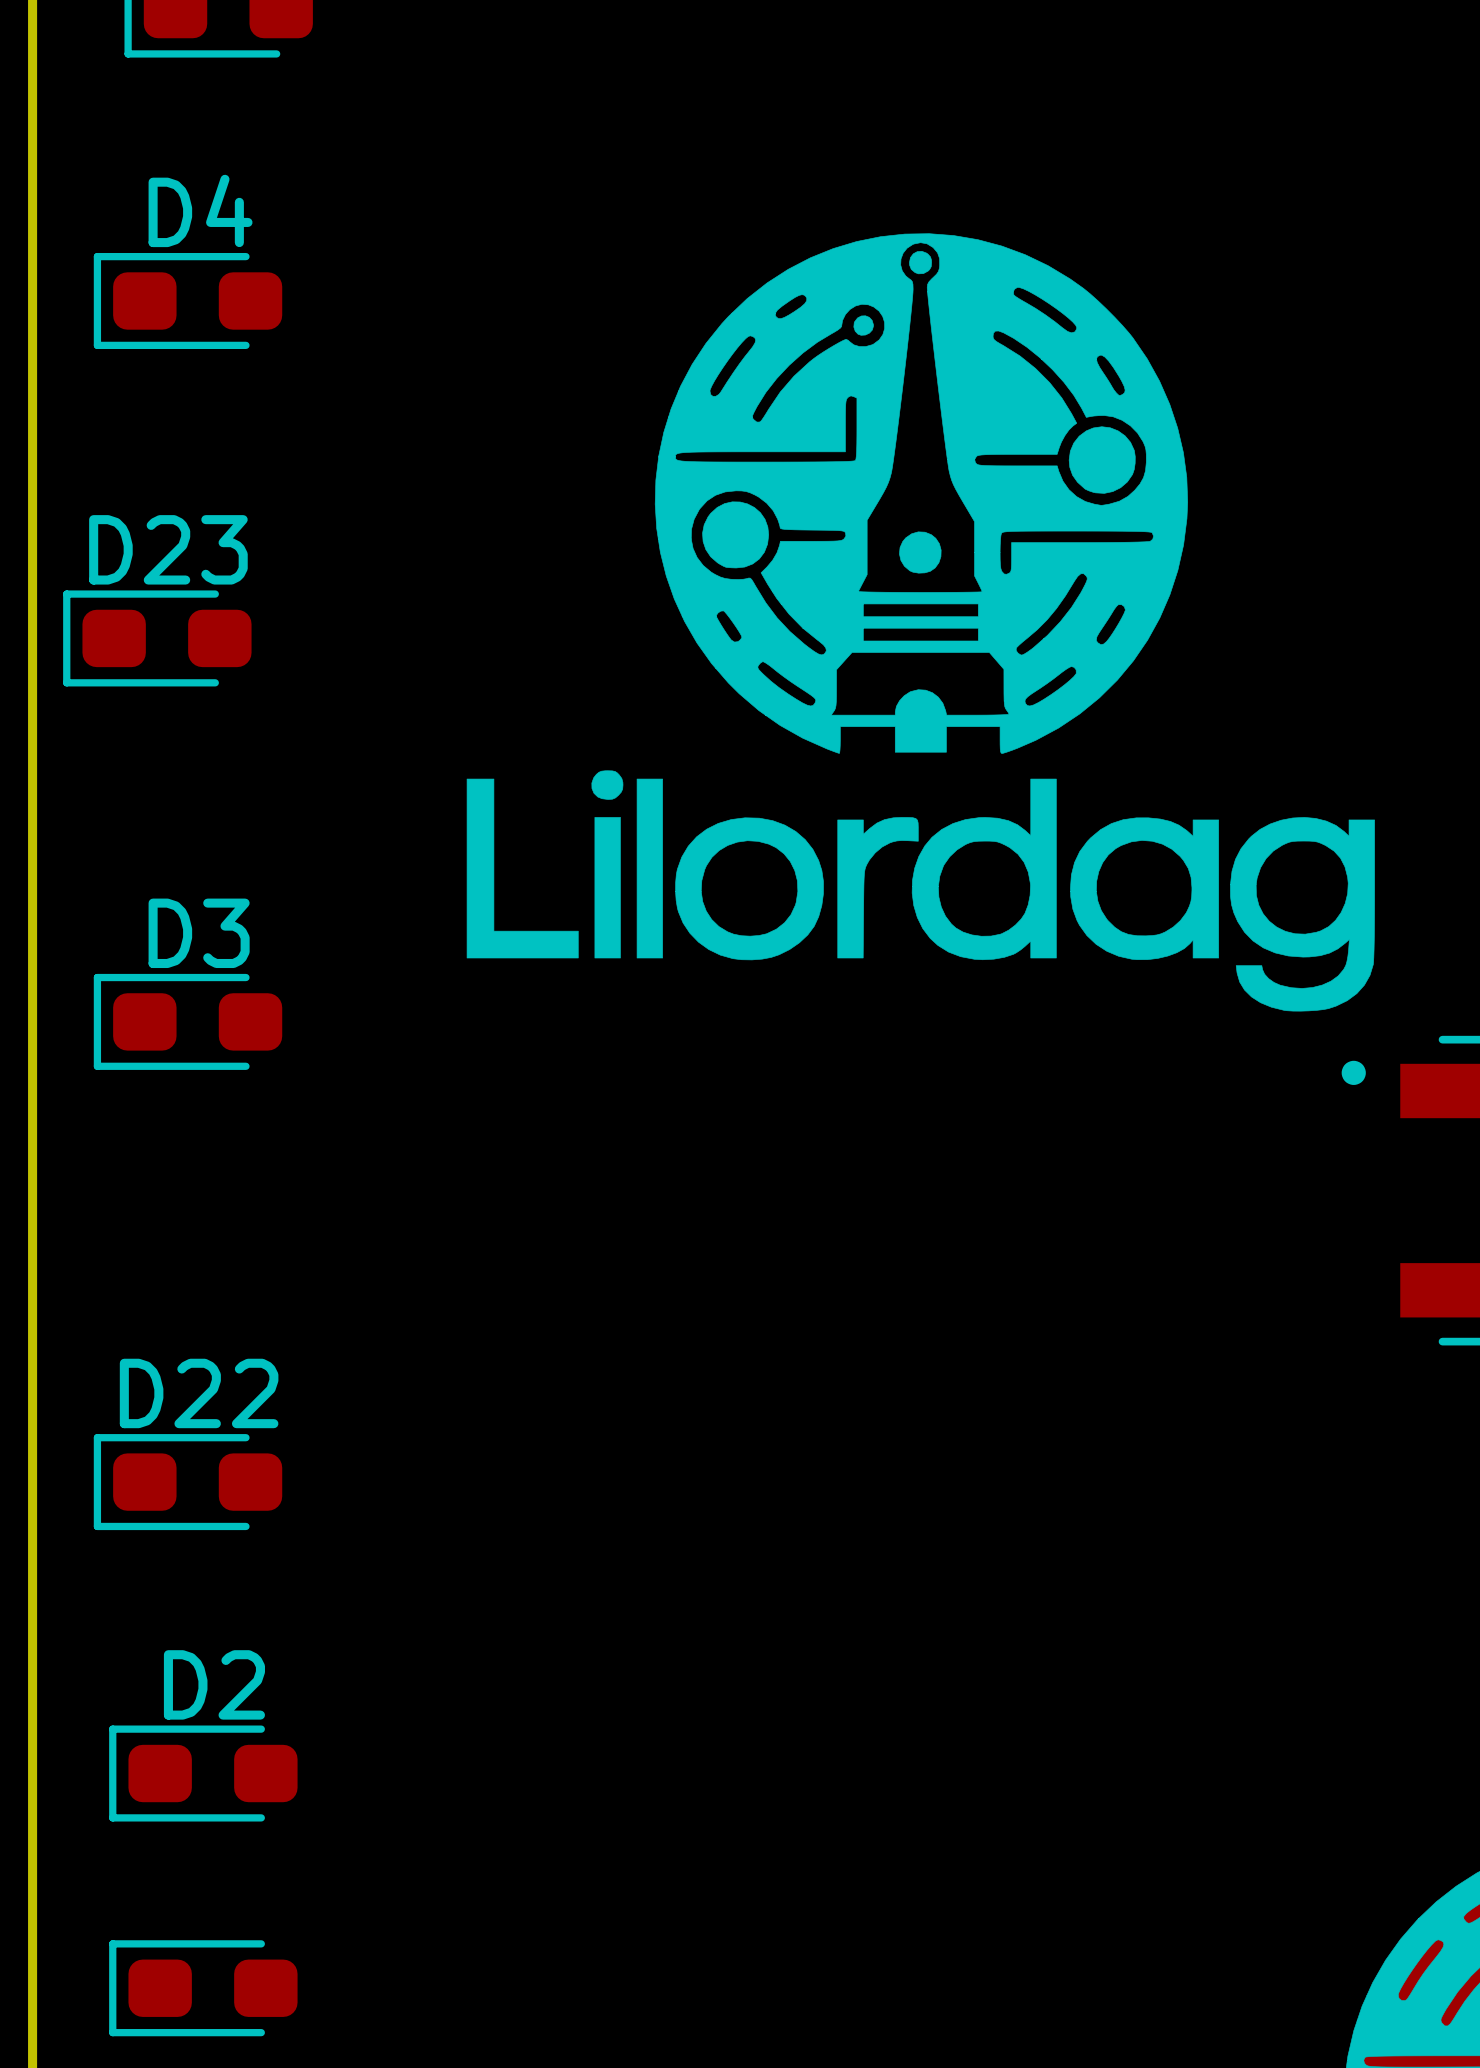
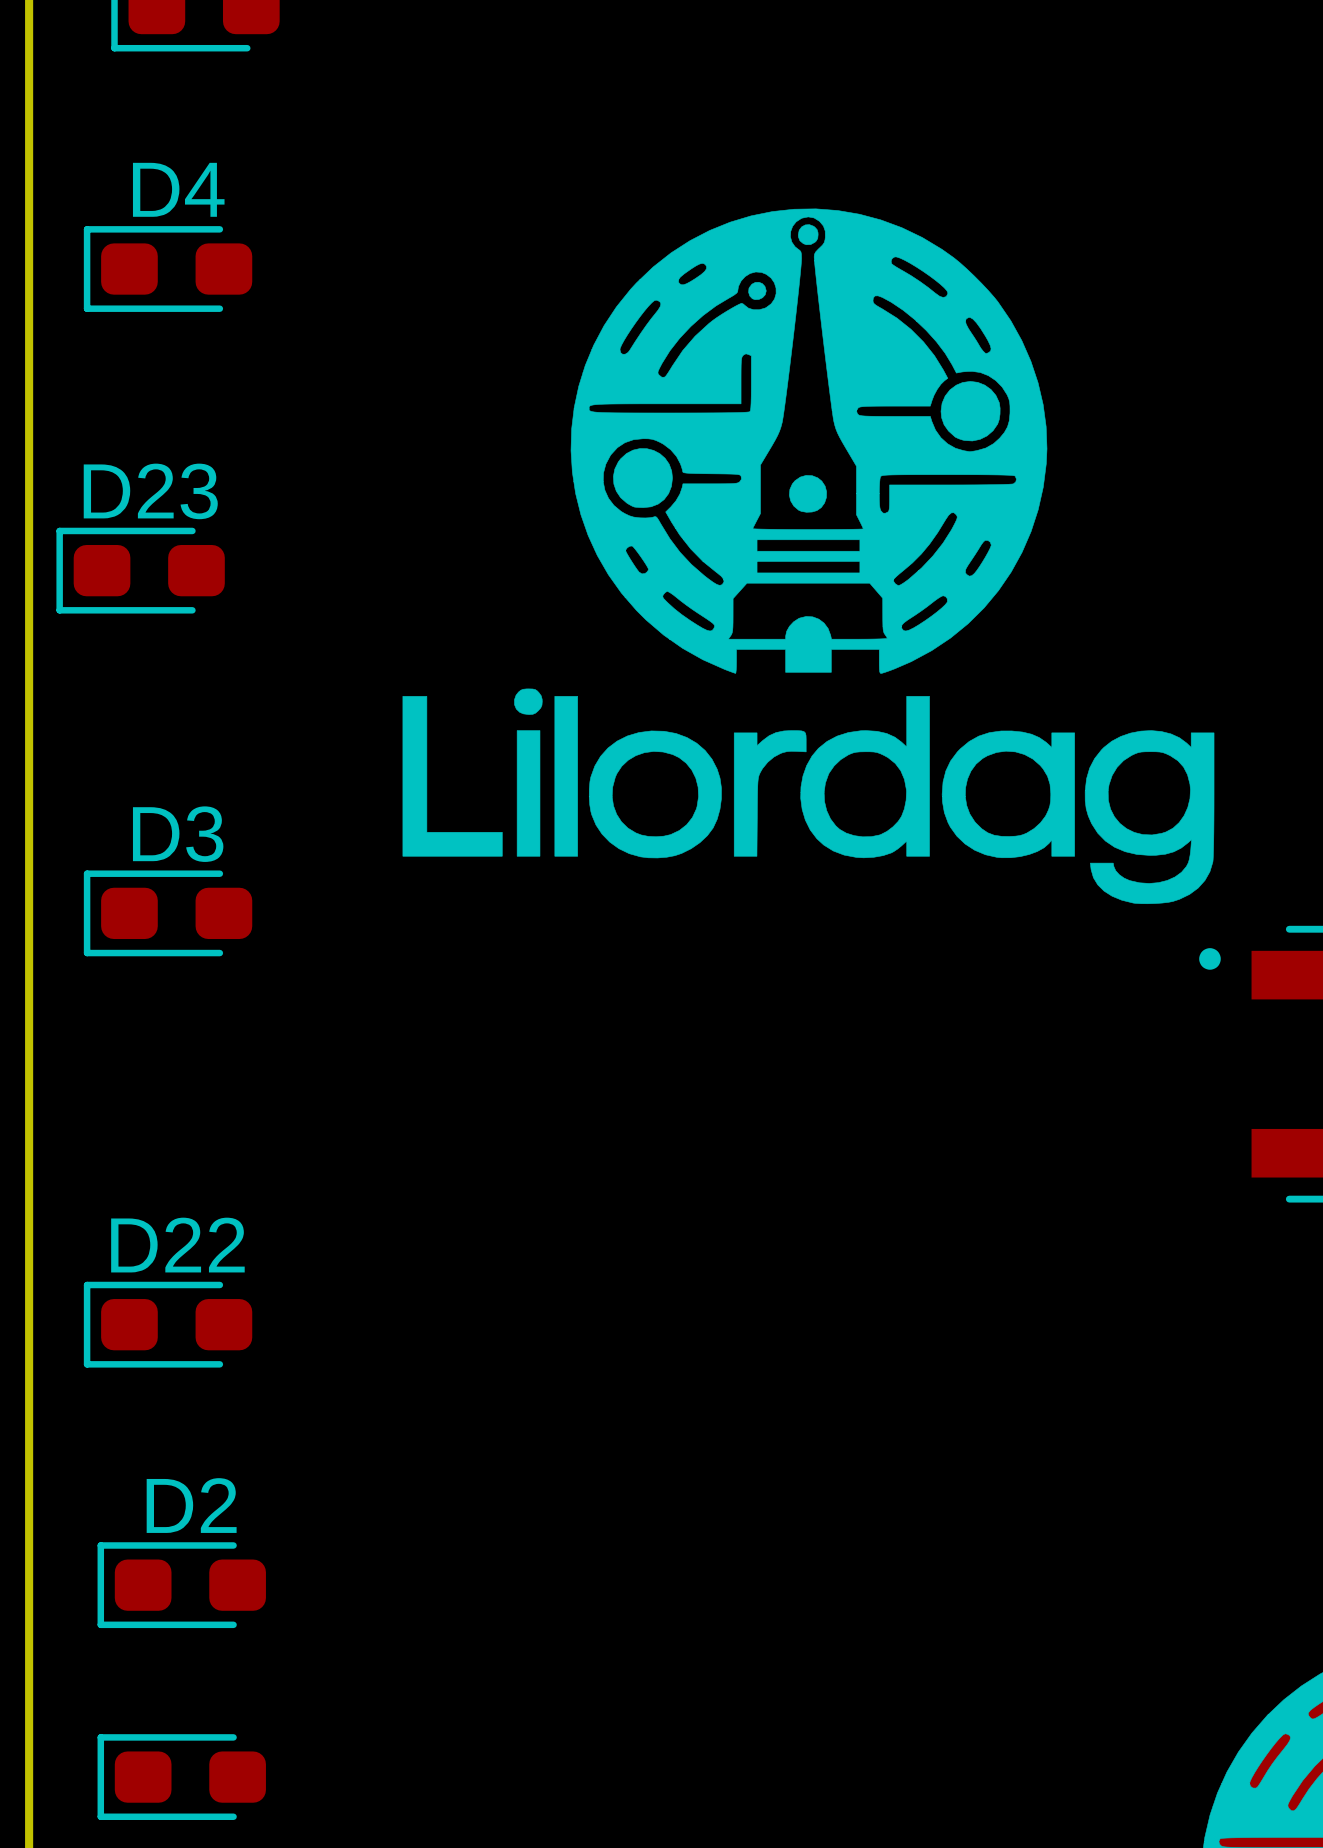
drawing position: (920, 622) -> (808, 556)

